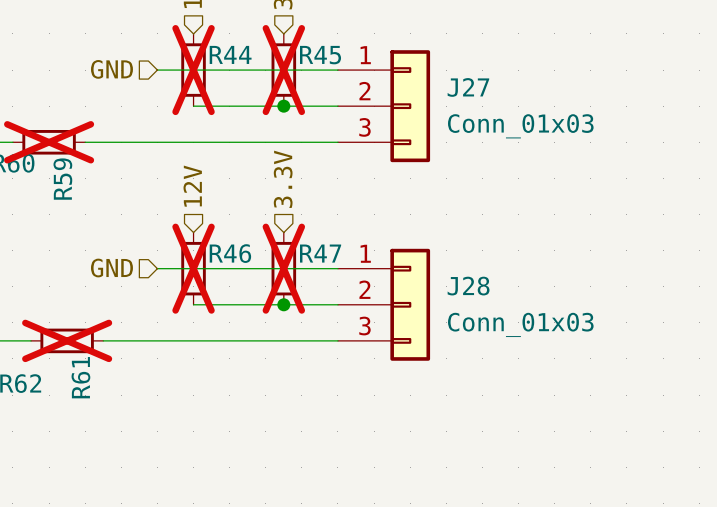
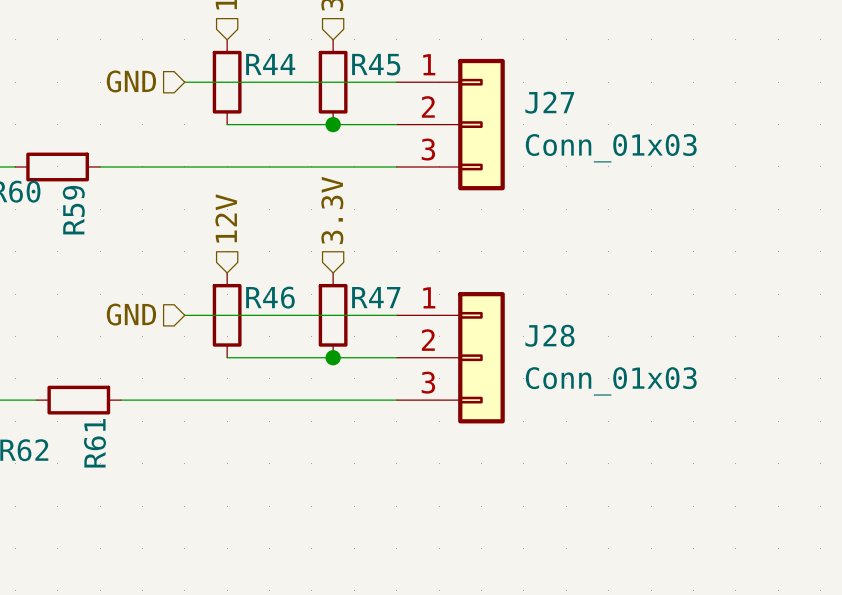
R44 do-not-place cross: (193, 70) -> none
R45 do-not-place cross: (283, 70) -> none
R59 do-not-place cross: (49, 142) -> none
R46 do-not-place cross: (193, 268) -> none
R47 do-not-place cross: (283, 268) -> none
R61 do-not-place cross: (67, 340) -> none

